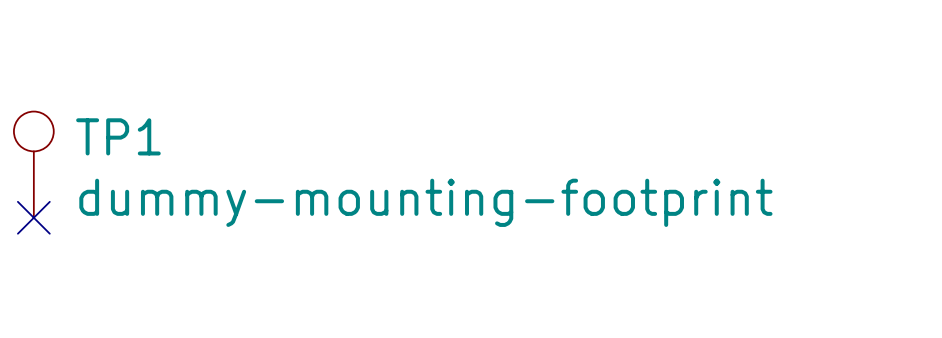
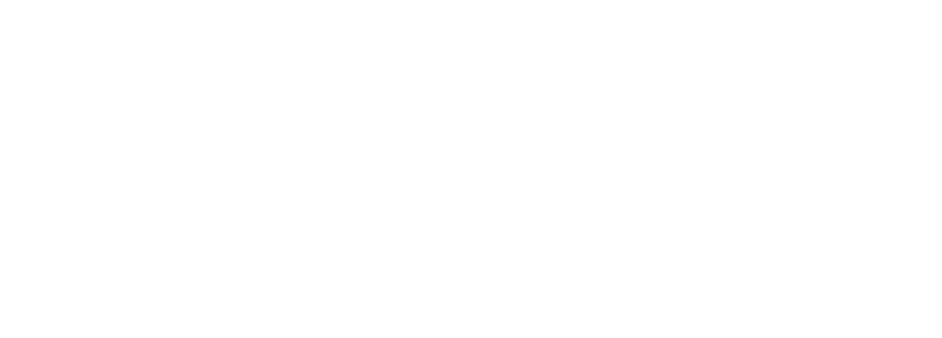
TP1: dummy-mounting-footprint (33, 164) -> none
no-connect mark: (33, 217) -> none

